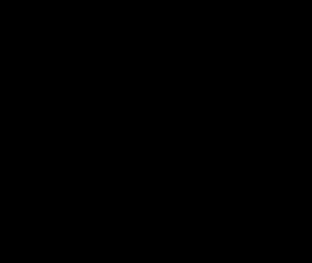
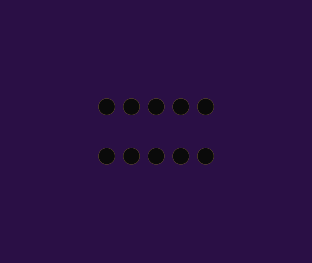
part: none -> (156, 131)

